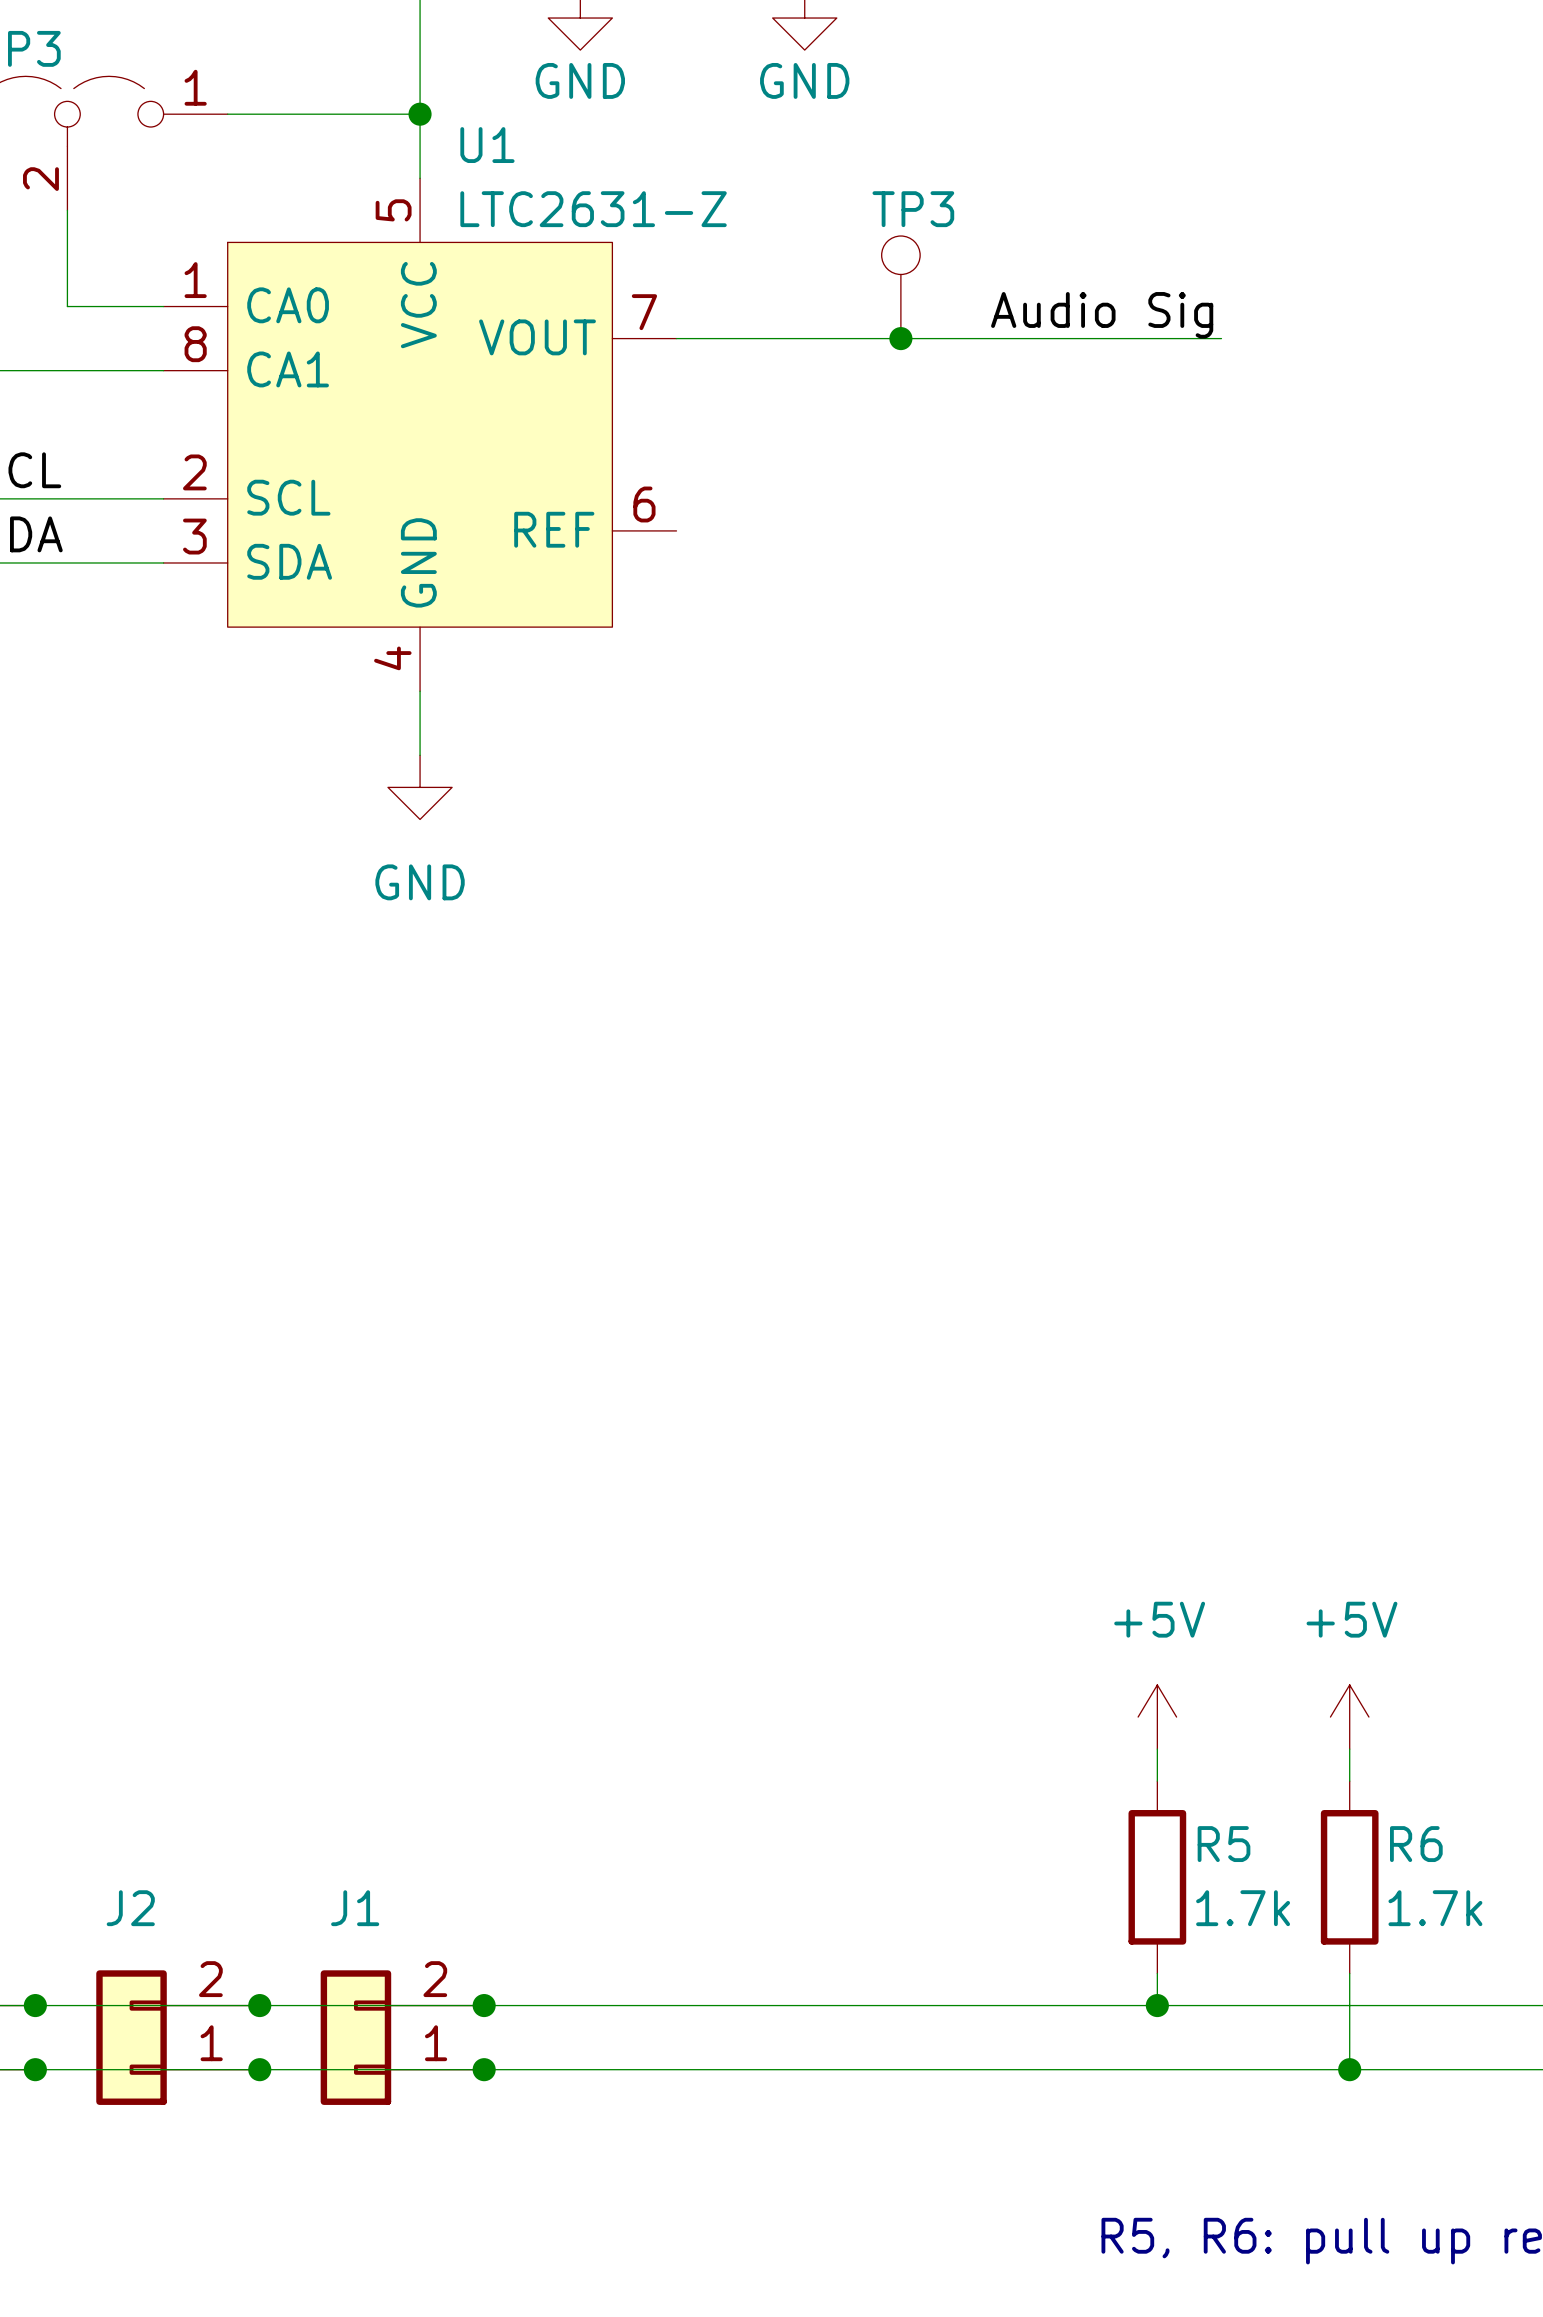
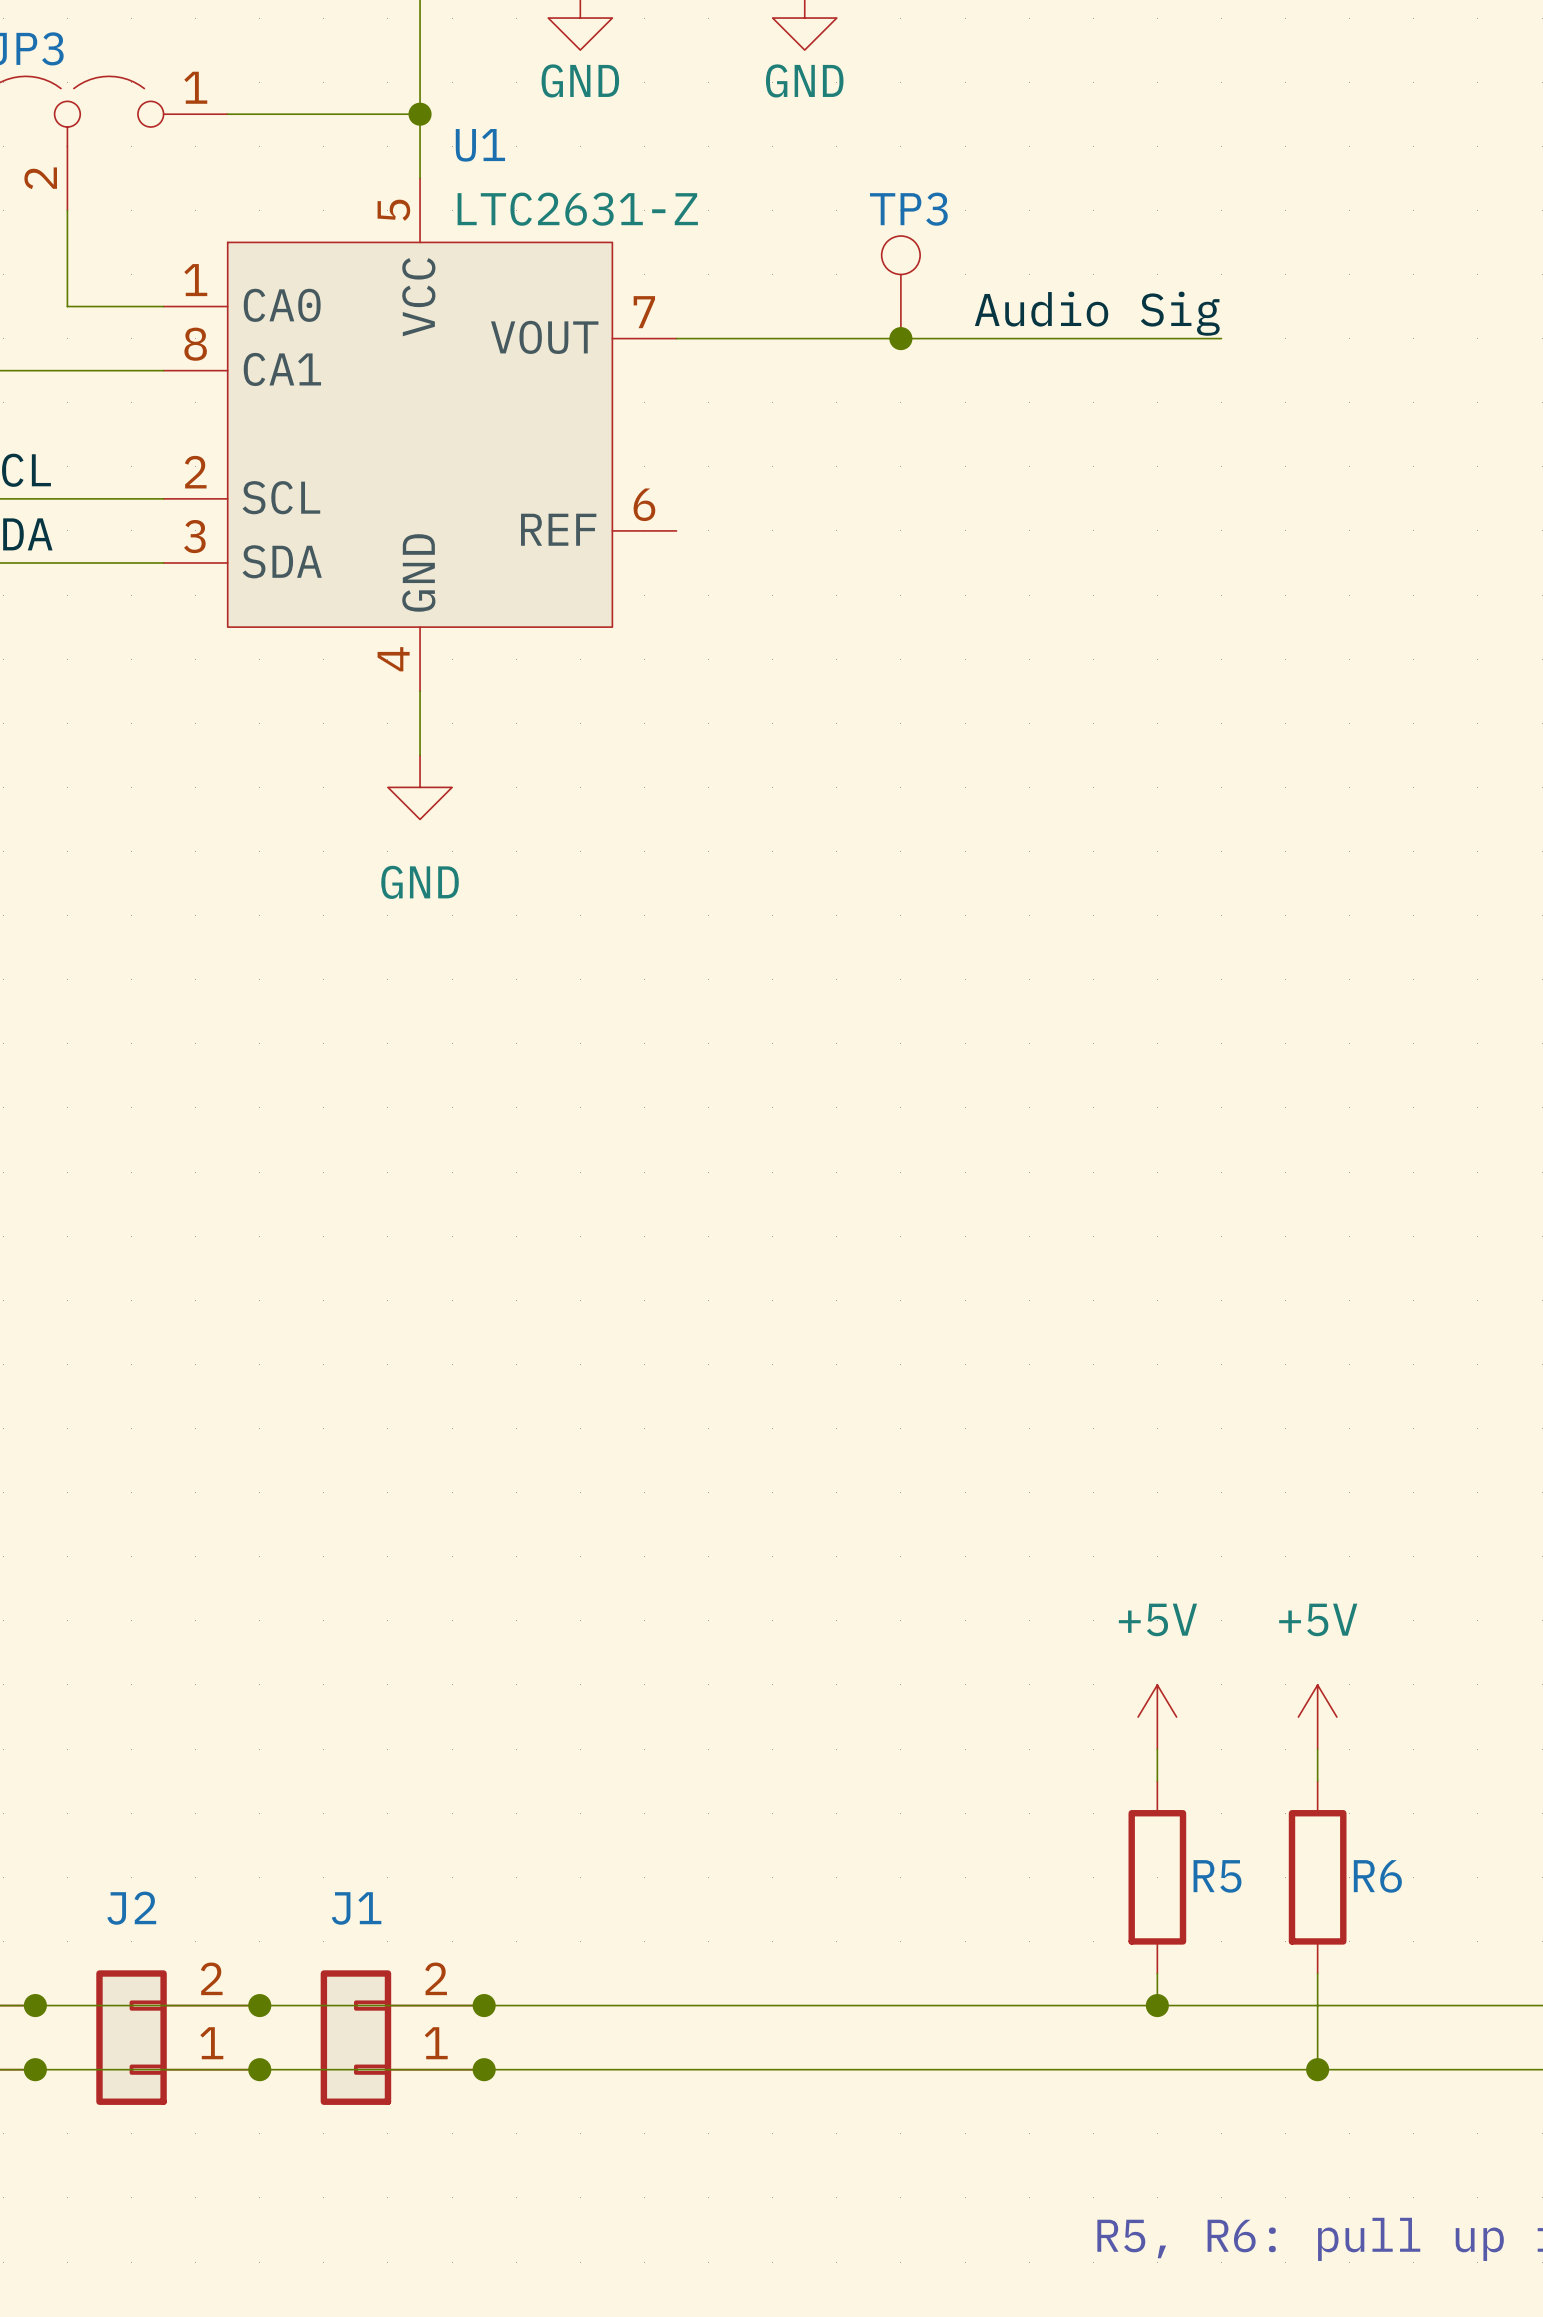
power symbol position: +5V (1349, 1717) -> +5V (1317, 1717)
wire: (1349, 1749) (1349, 1781) -> (1317, 1749) (1317, 1781)
R5 name position: R5 (1224, 1844) -> R5 (1217, 1876)
R6 name position: R6 (1416, 1844) -> R6 (1377, 1876)
R6 position: (1349, 1877) -> (1317, 1877)
R5 value: 1.7k (1243, 1908) -> none
R6 value: 1.7k (1435, 1908) -> none
wire: (1349, 1973) (1349, 2069) -> (1317, 1973) (1317, 2069)
junction position: (1349, 2069) -> (1317, 2069)

